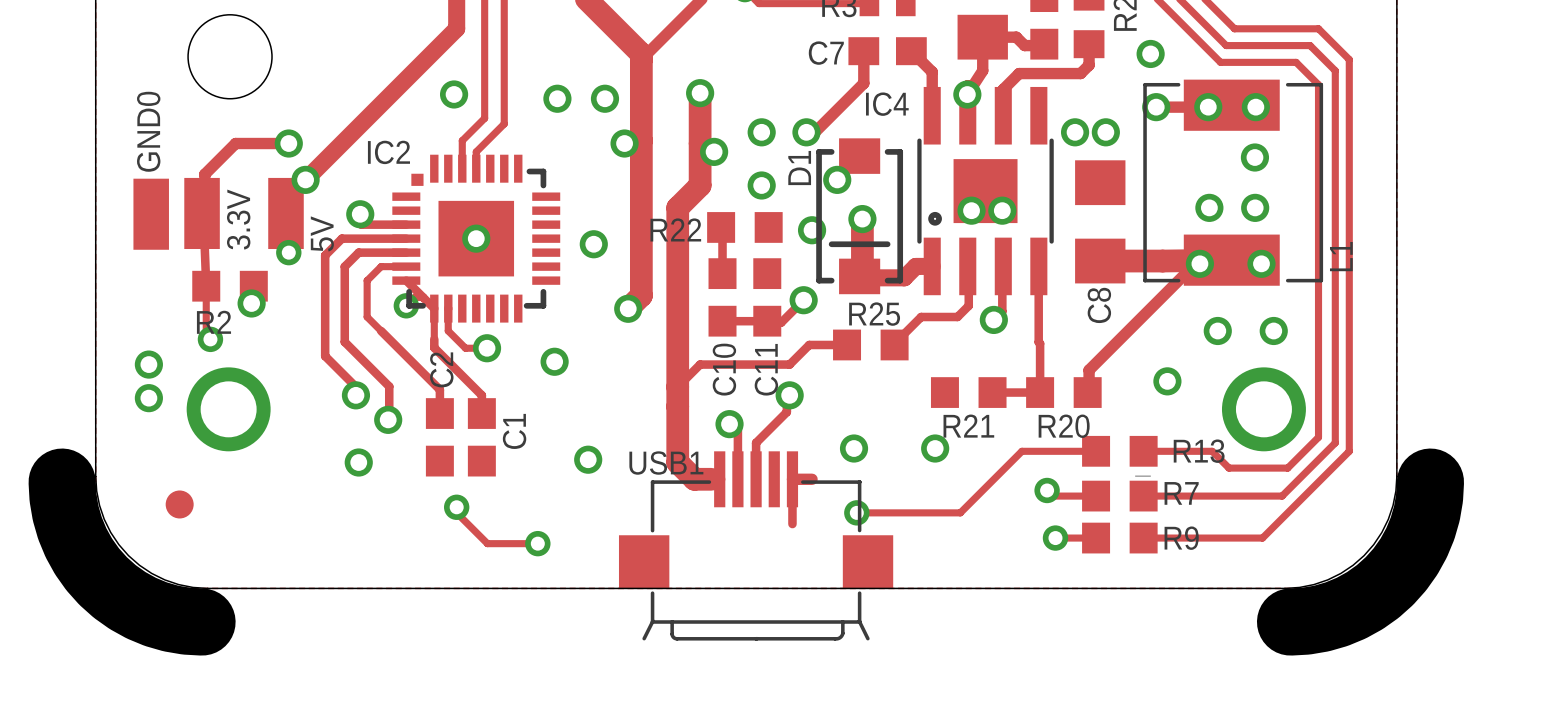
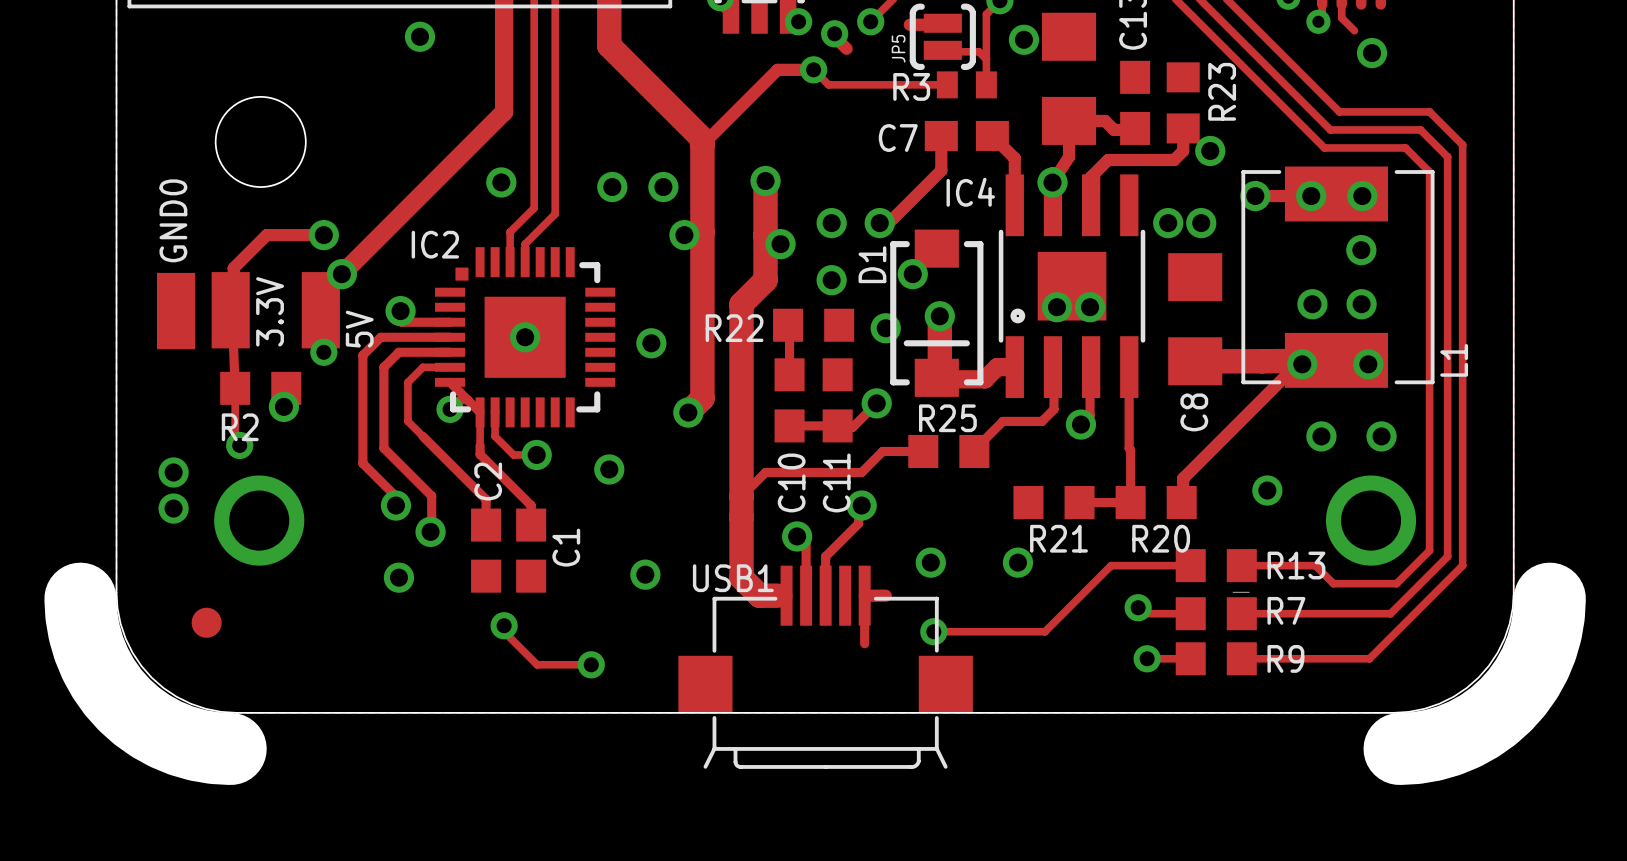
via position: (1150, 53) -> (1210, 150)

